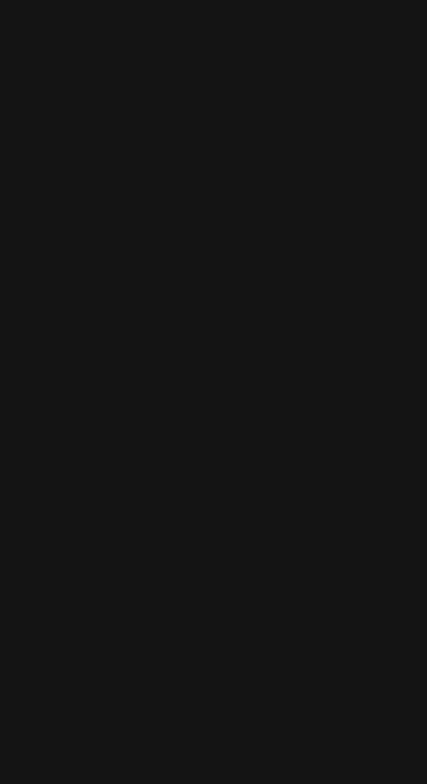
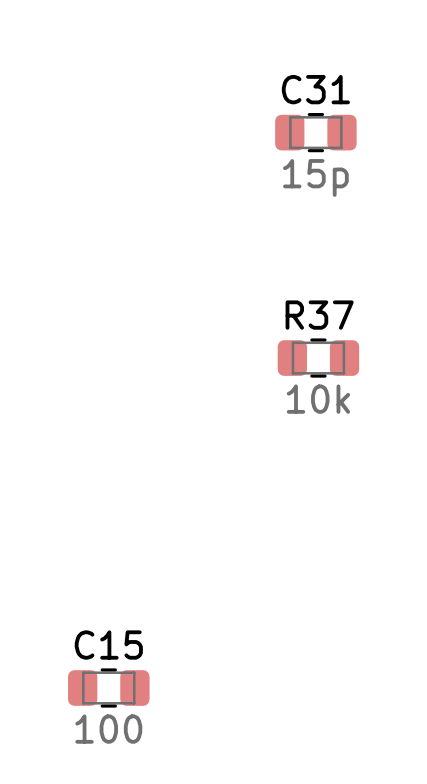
C31: none -> 15p (315, 132)
R37: none -> 10k (318, 358)
C15: none -> 100 (108, 688)

